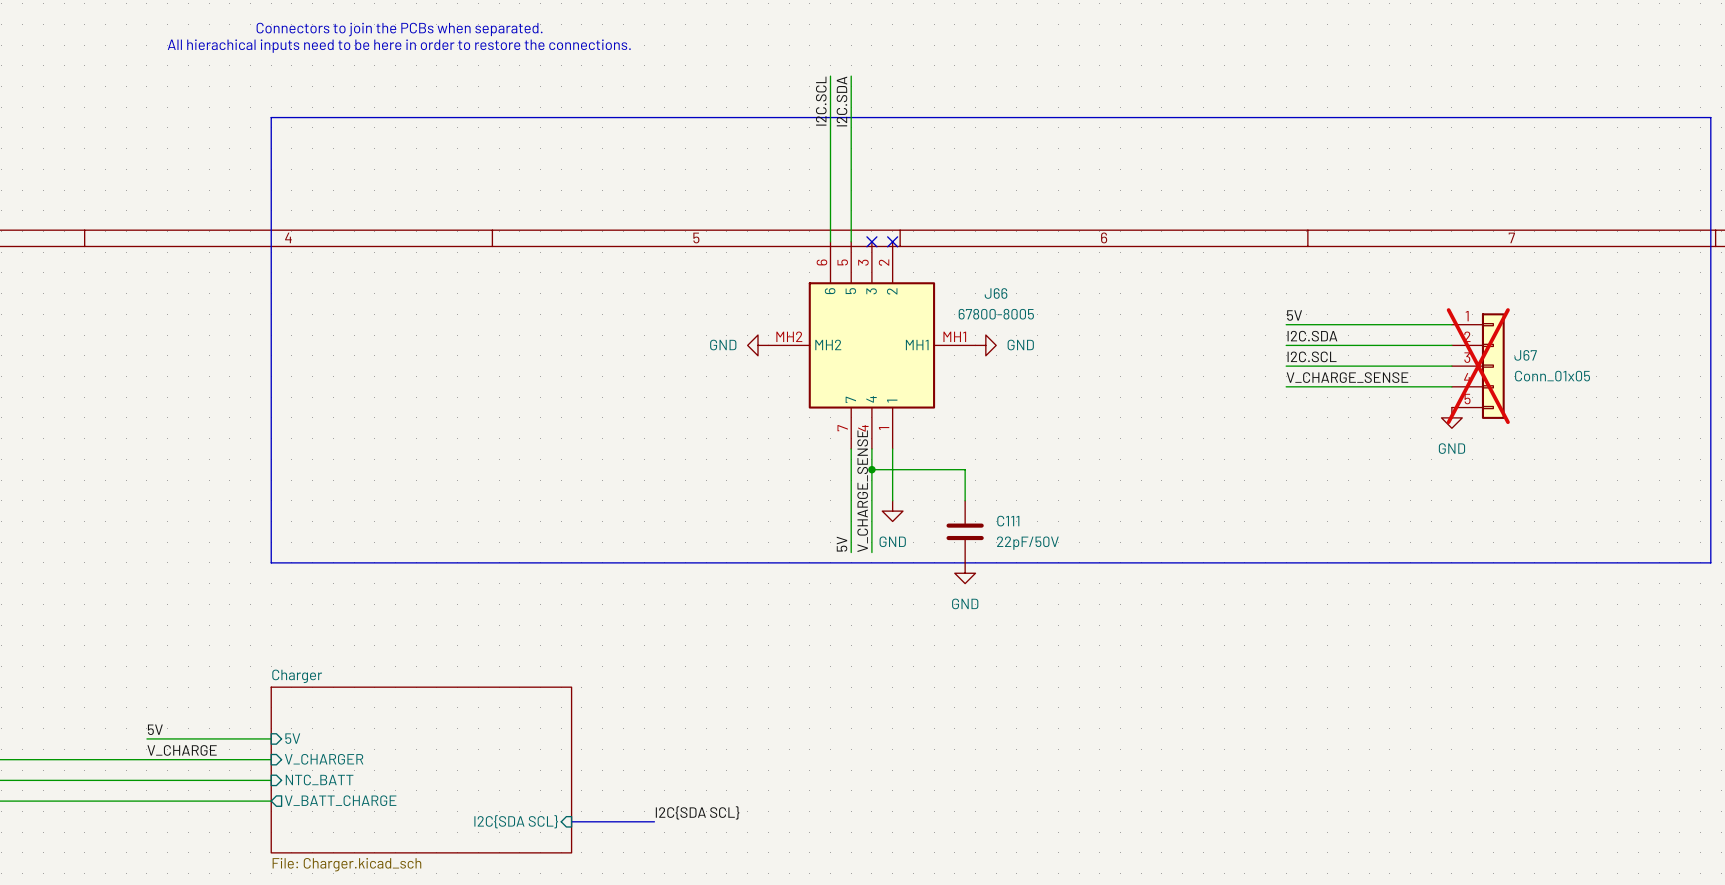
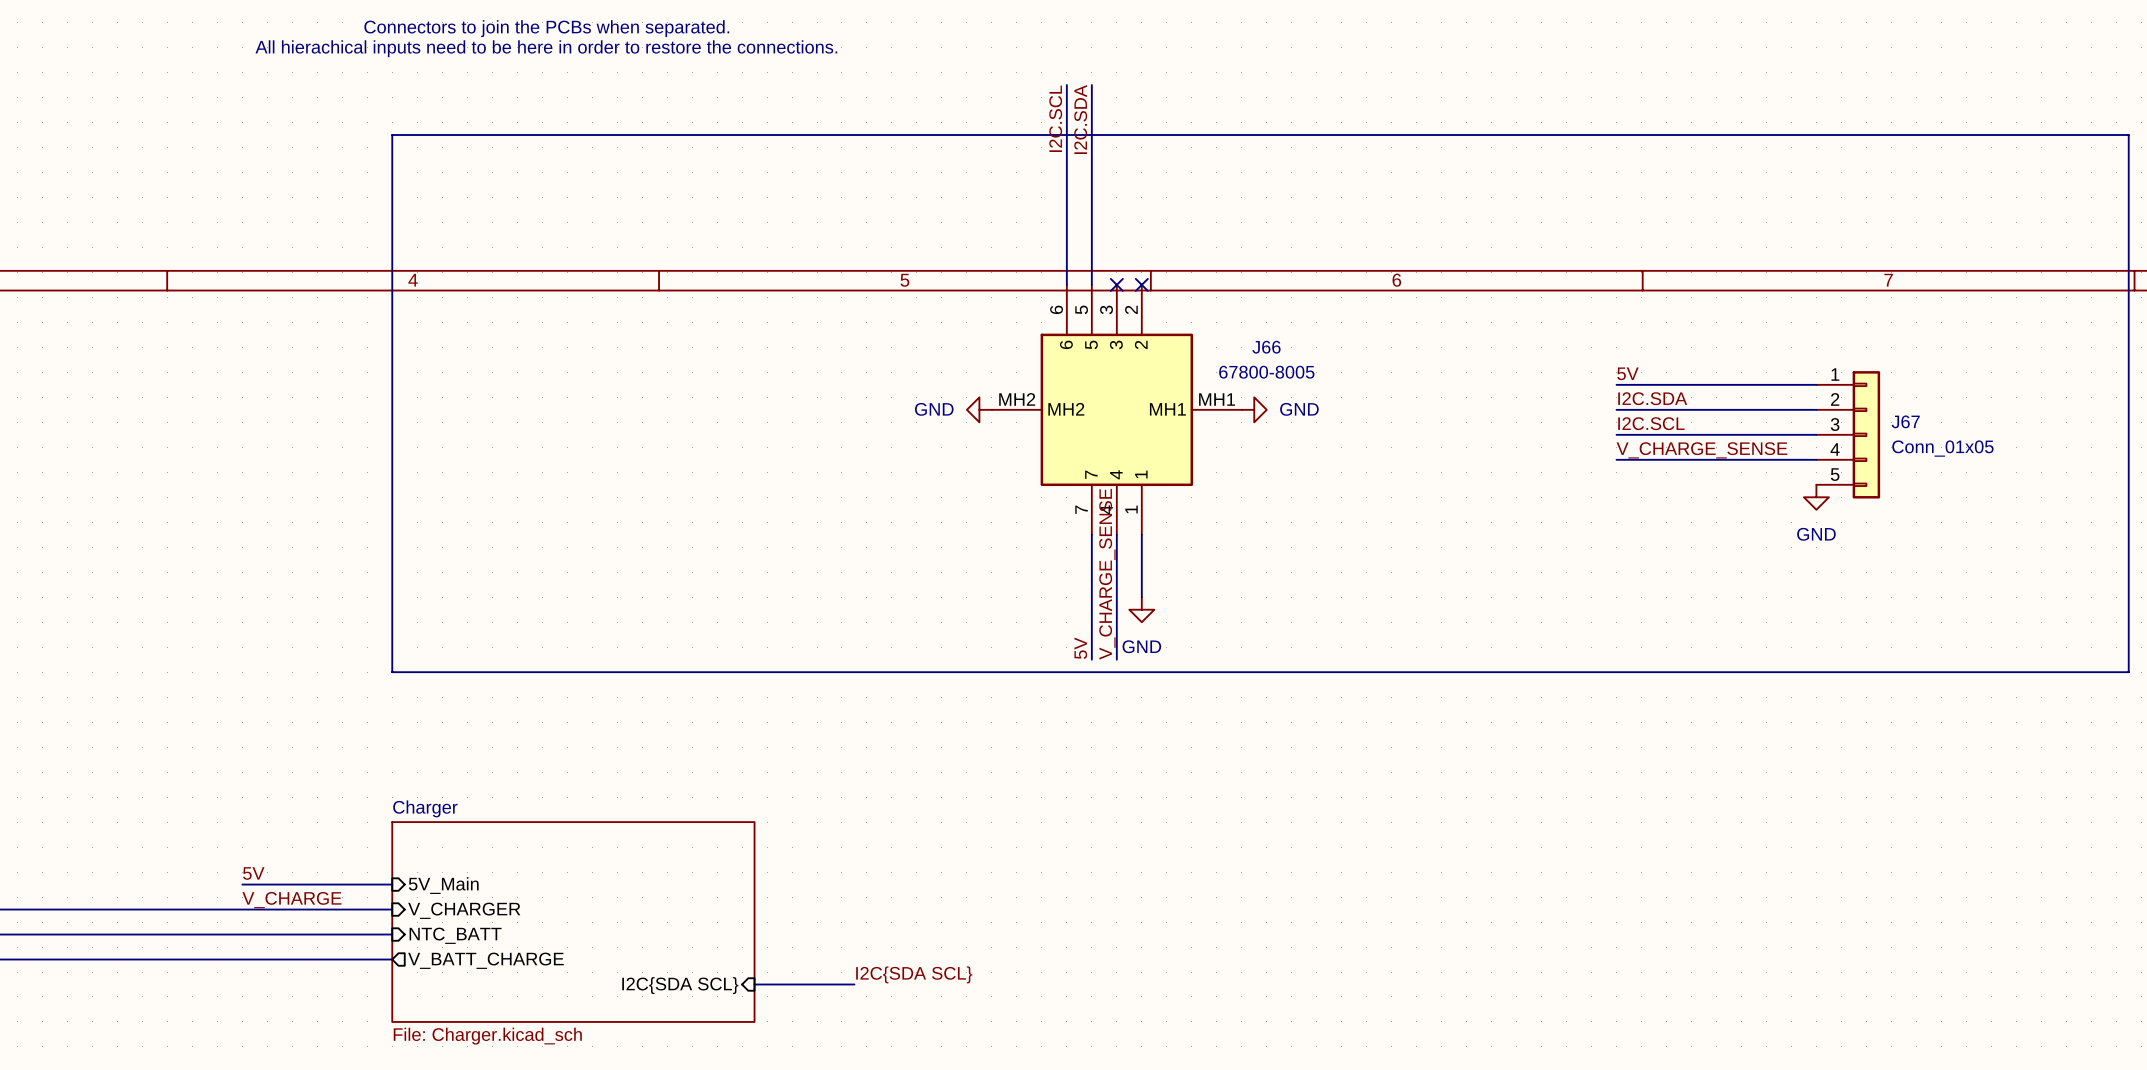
J67 do-not-place cross: (1478, 366) -> none
wire: (871, 469) (965, 469) (965, 500) -> none
junction: (871, 469) -> none
C111: 22pF/50V (965, 531) -> none
power symbol: GND (965, 573) -> none
sheet pin: 5V (292, 738) -> 5V_Main (443, 885)

